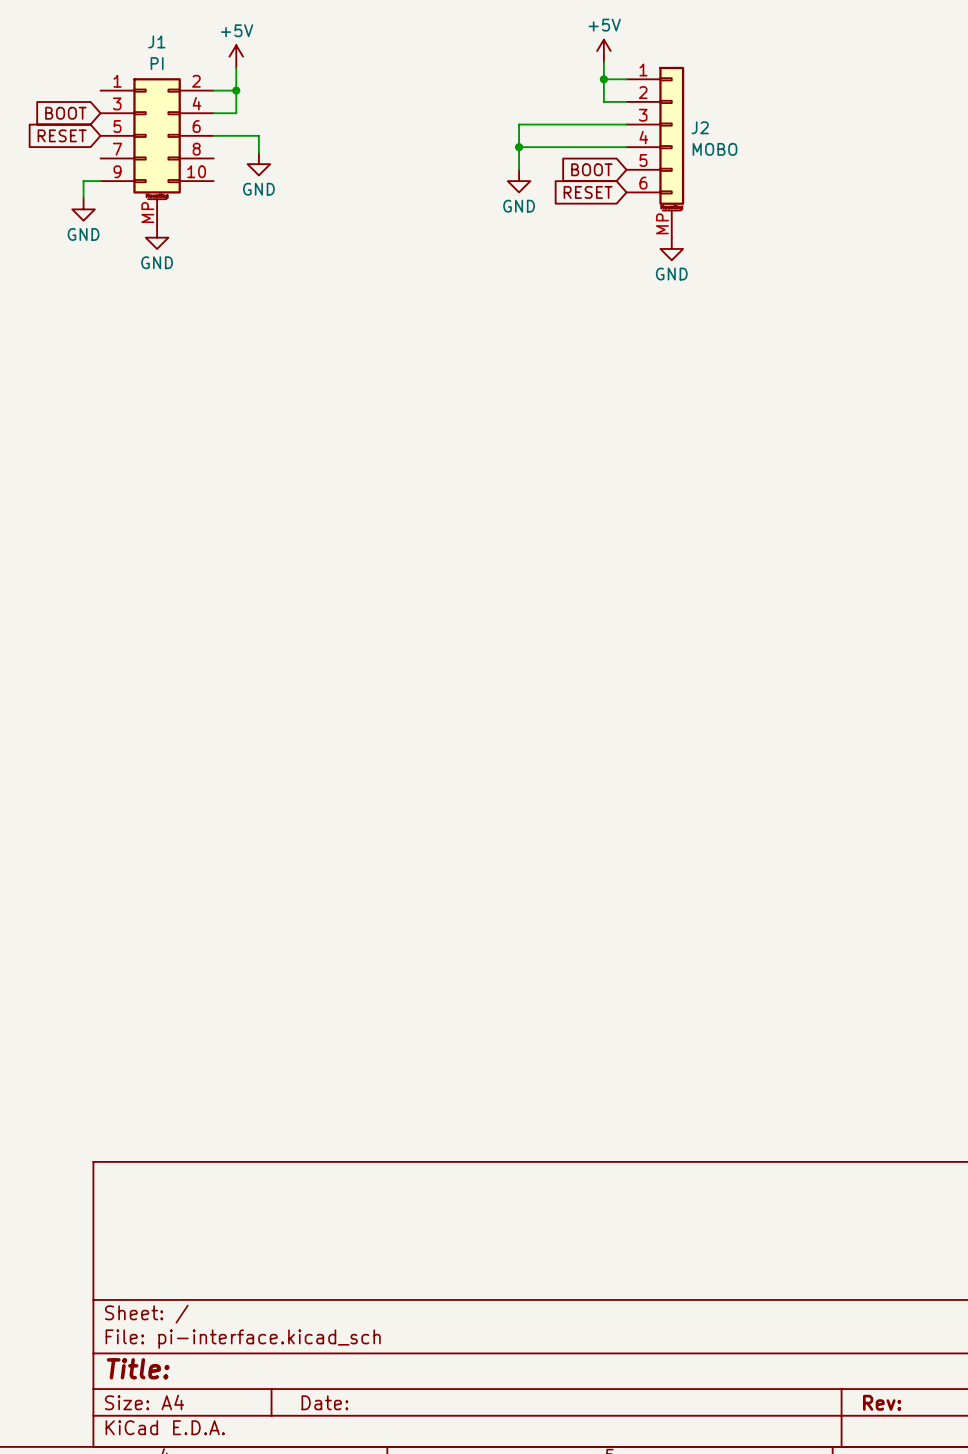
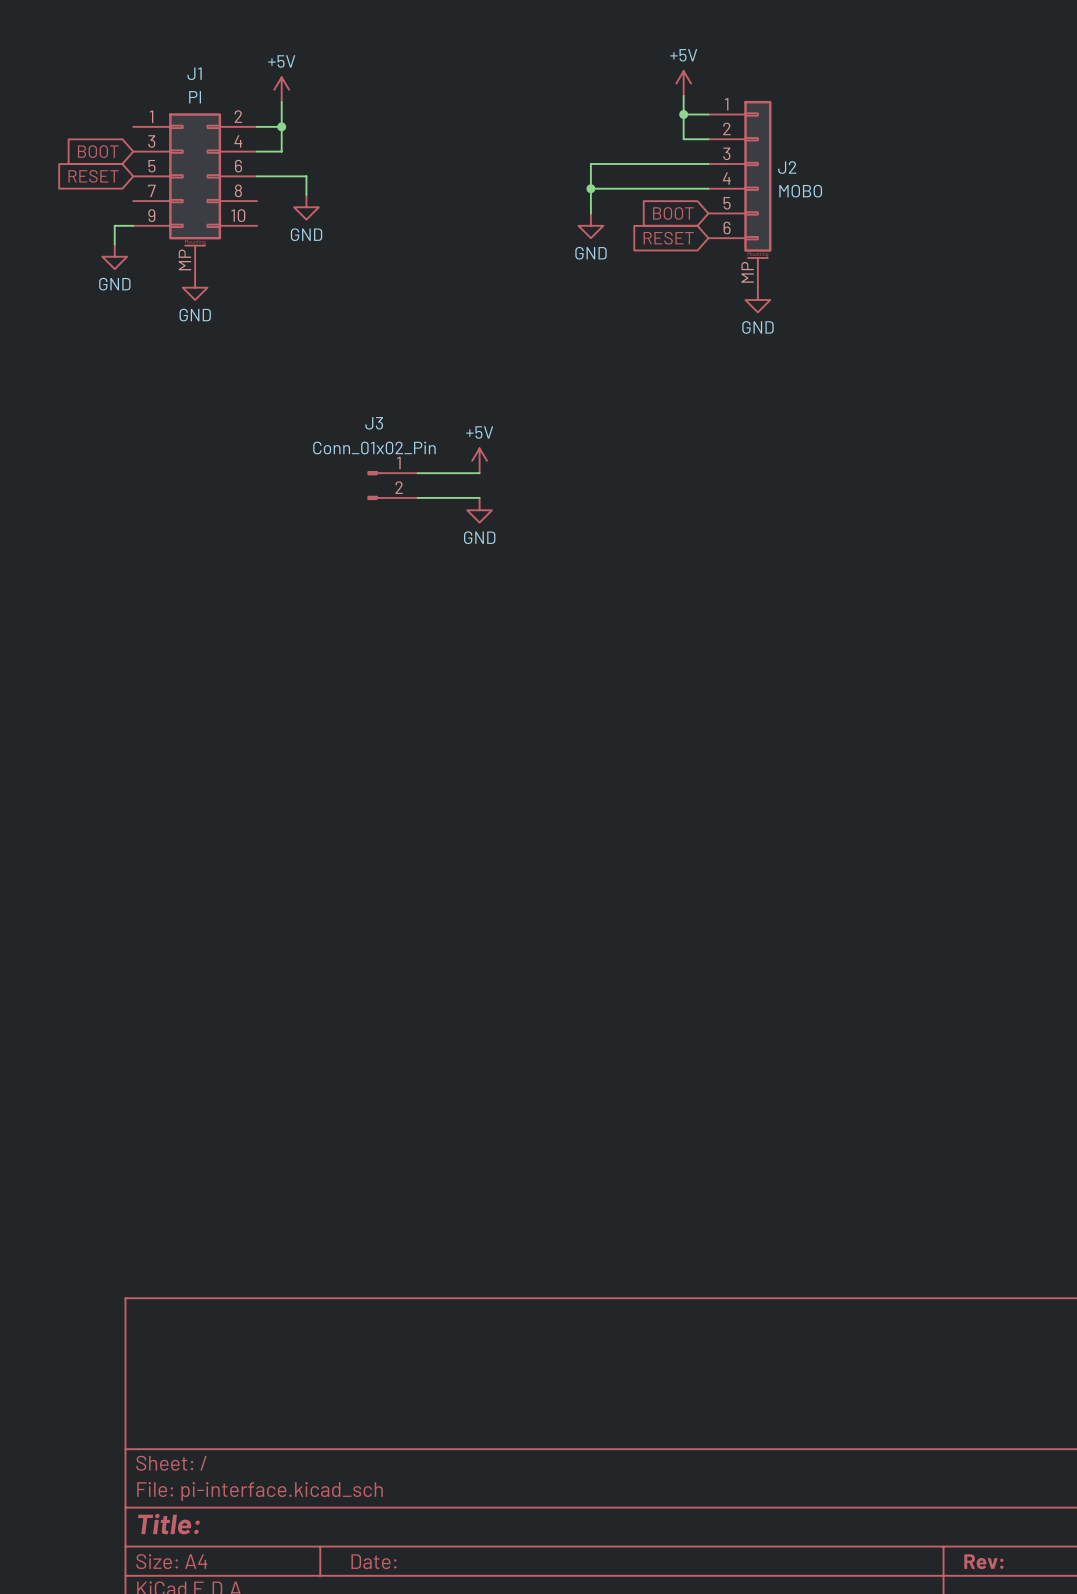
power symbol: none -> +5V (479, 460)
wire: none -> (417, 473) (479, 473)
J3: none -> Conn_01x02_Pin (392, 485)
wire: none -> (417, 497) (479, 497)
power symbol: none -> GND (479, 510)

